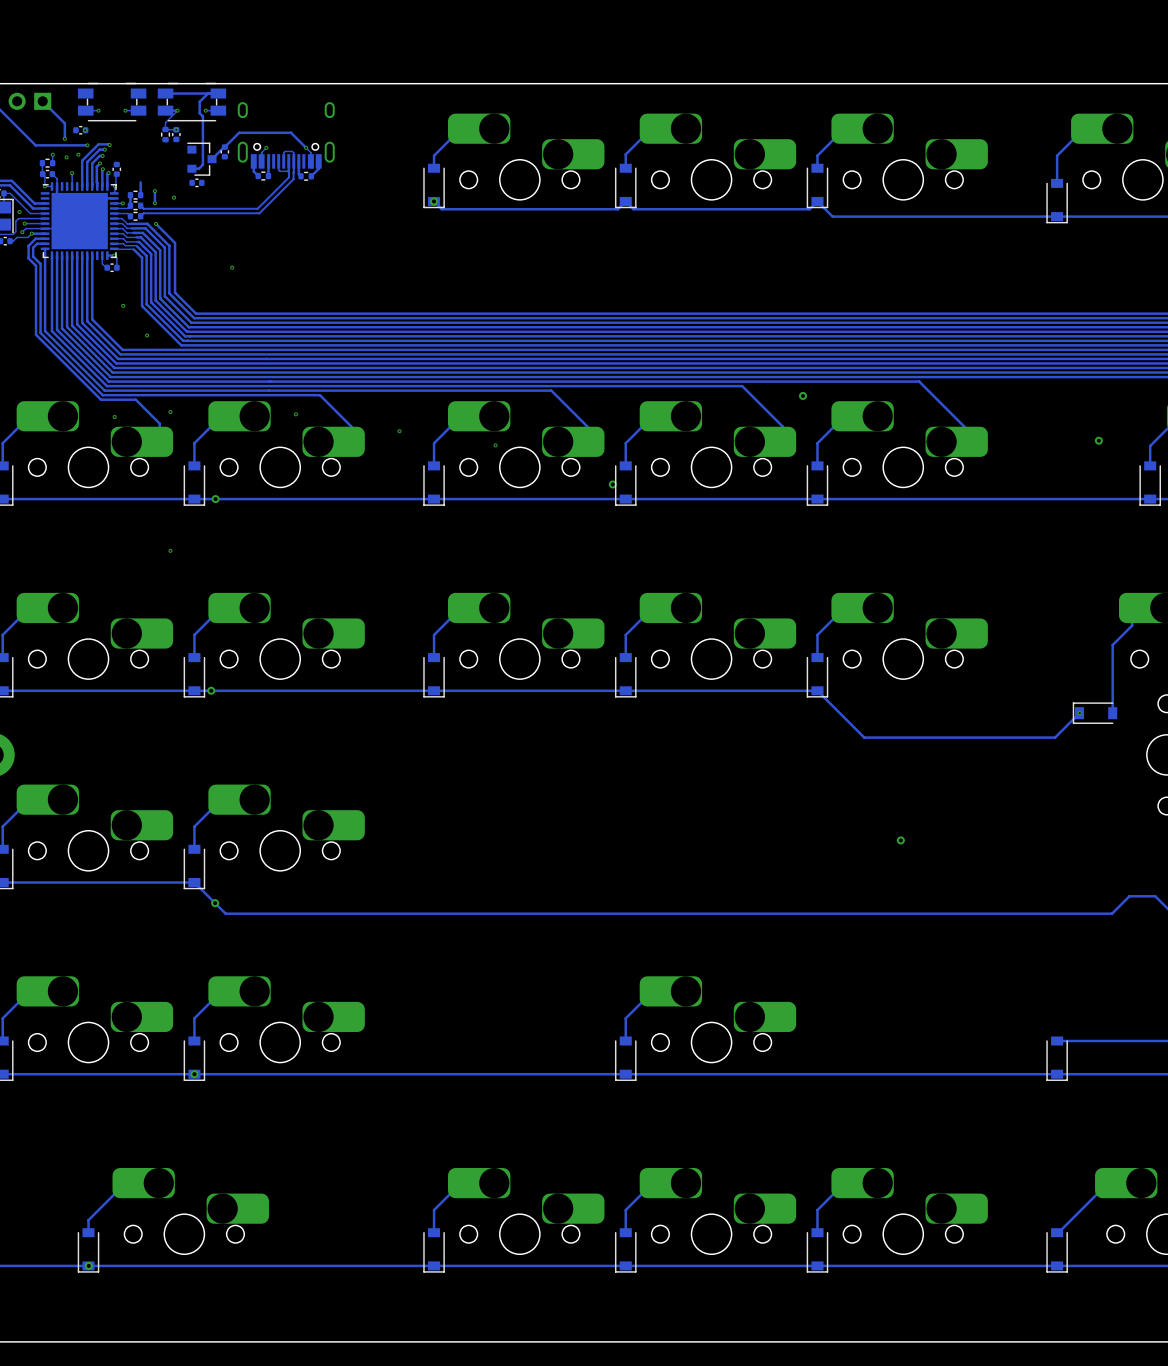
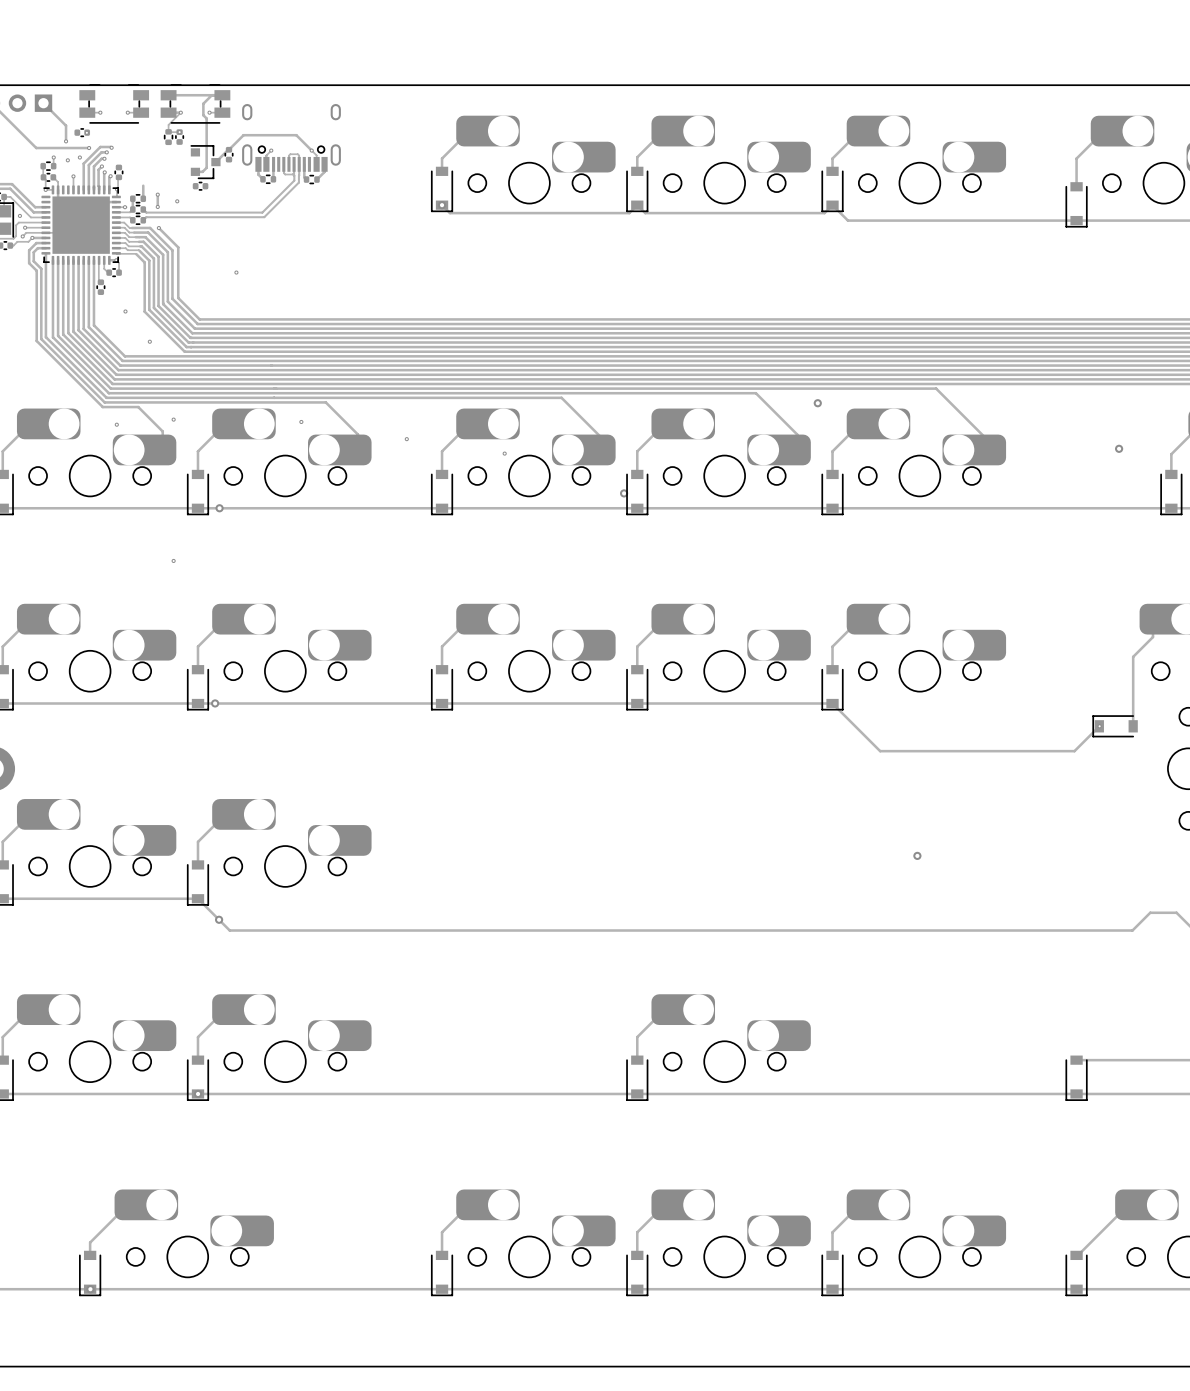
track: none -> (99, 260) (98, 280) (100, 282)
part: none -> (100, 287)

